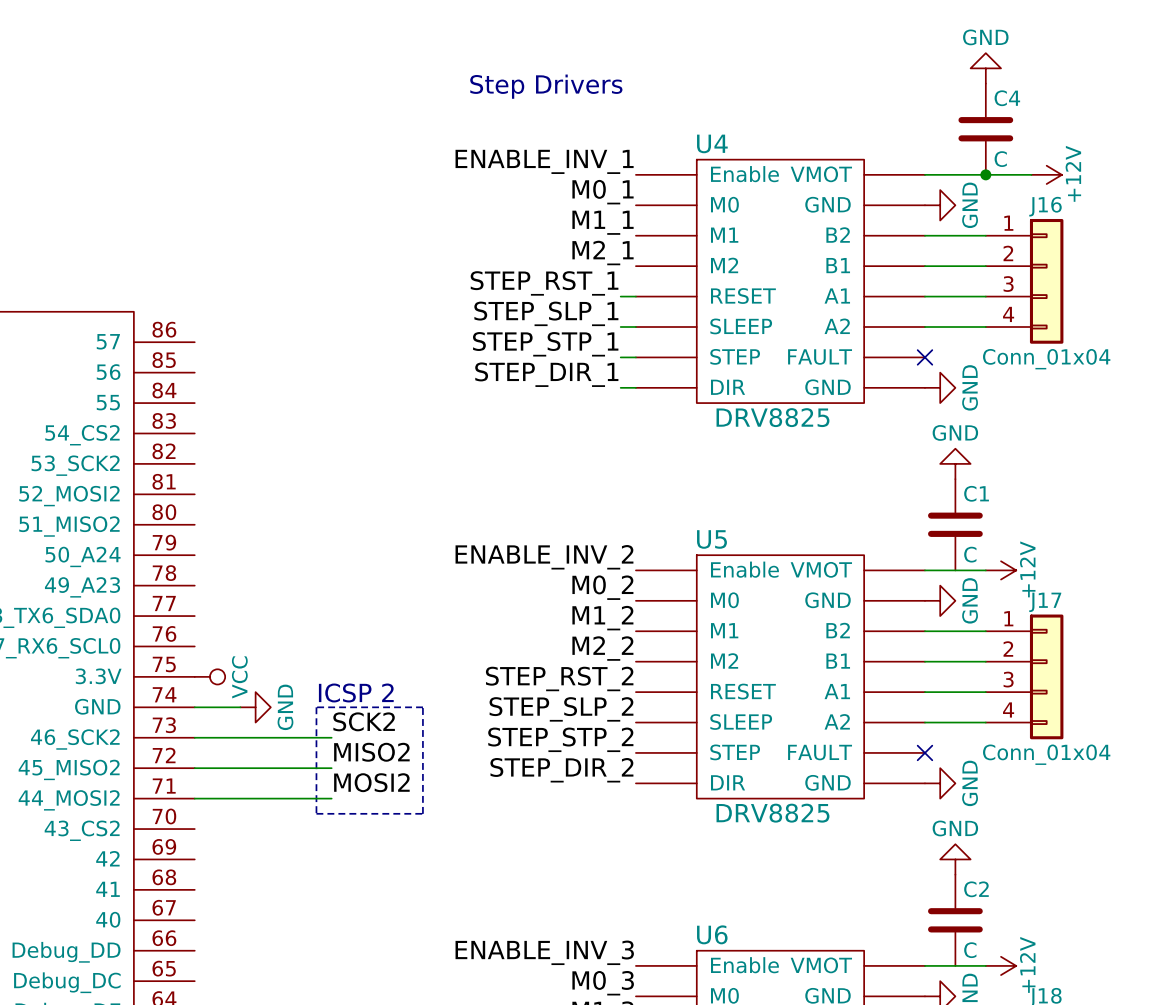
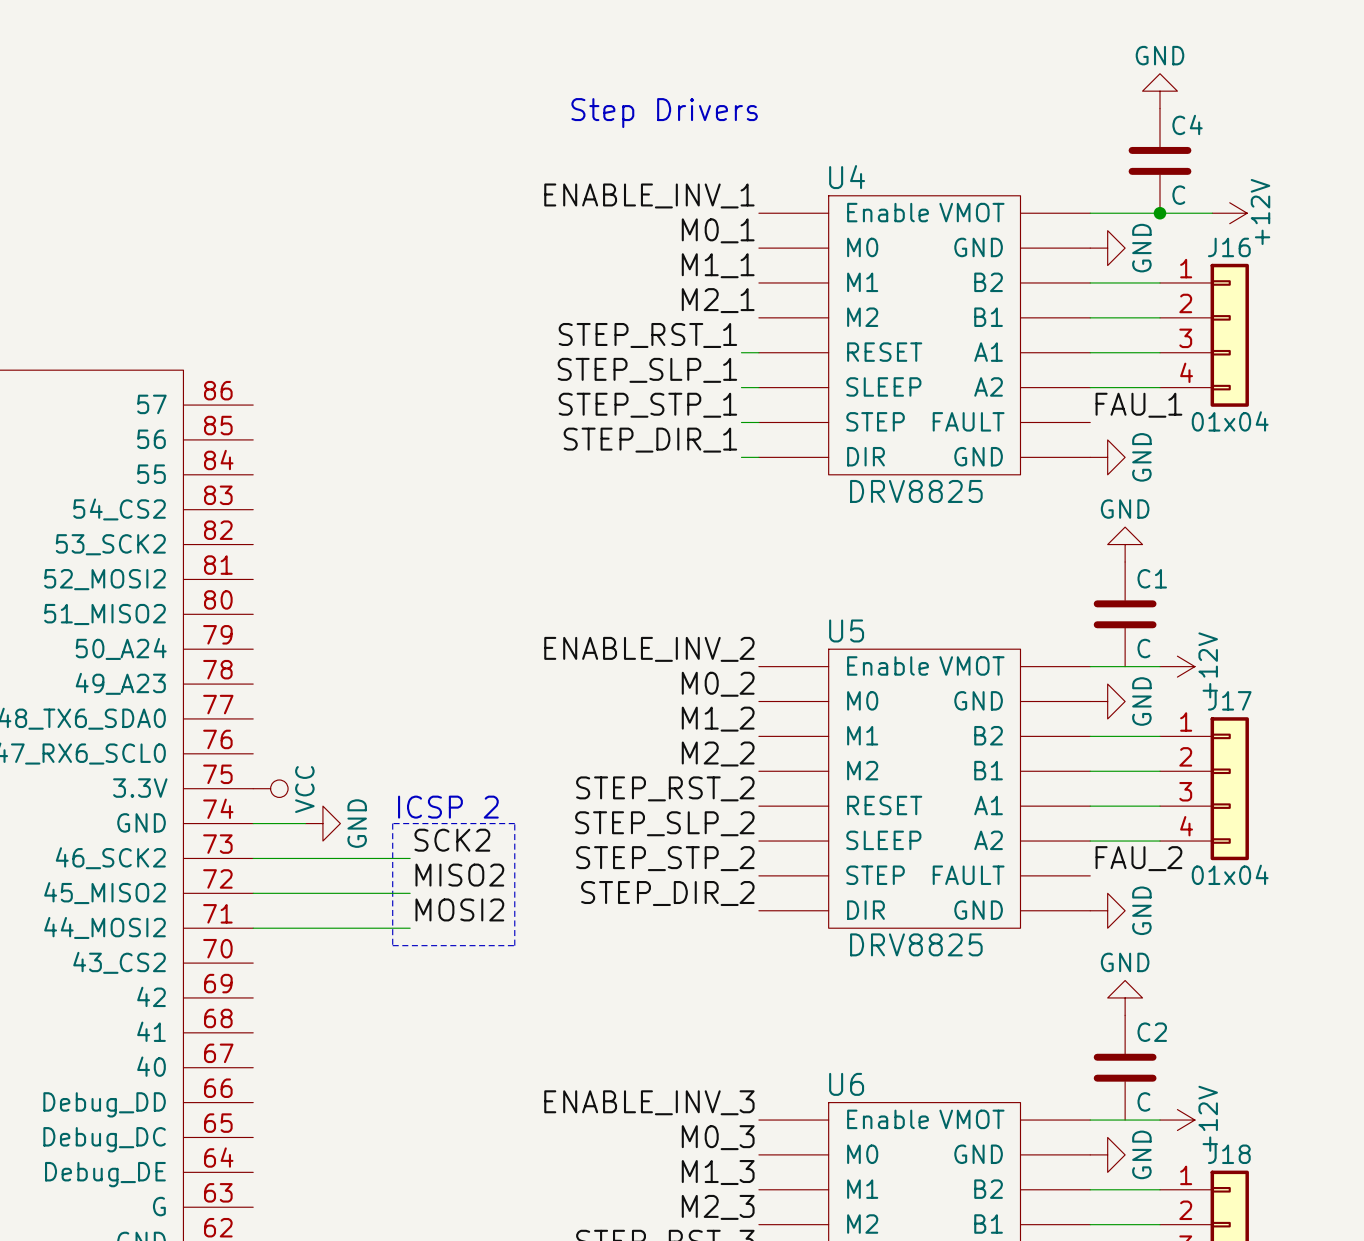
label: none -> FAU_1 (1138, 405)
no-connect mark: (924, 357) -> none
J16 value: Conn_01x04 (1046, 359) -> 01x04 (1230, 421)
label: none -> FAU_2 (1138, 858)
no-connect mark: (924, 752) -> none
J17 value: Conn_01x04 (1046, 754) -> 01x04 (1230, 874)

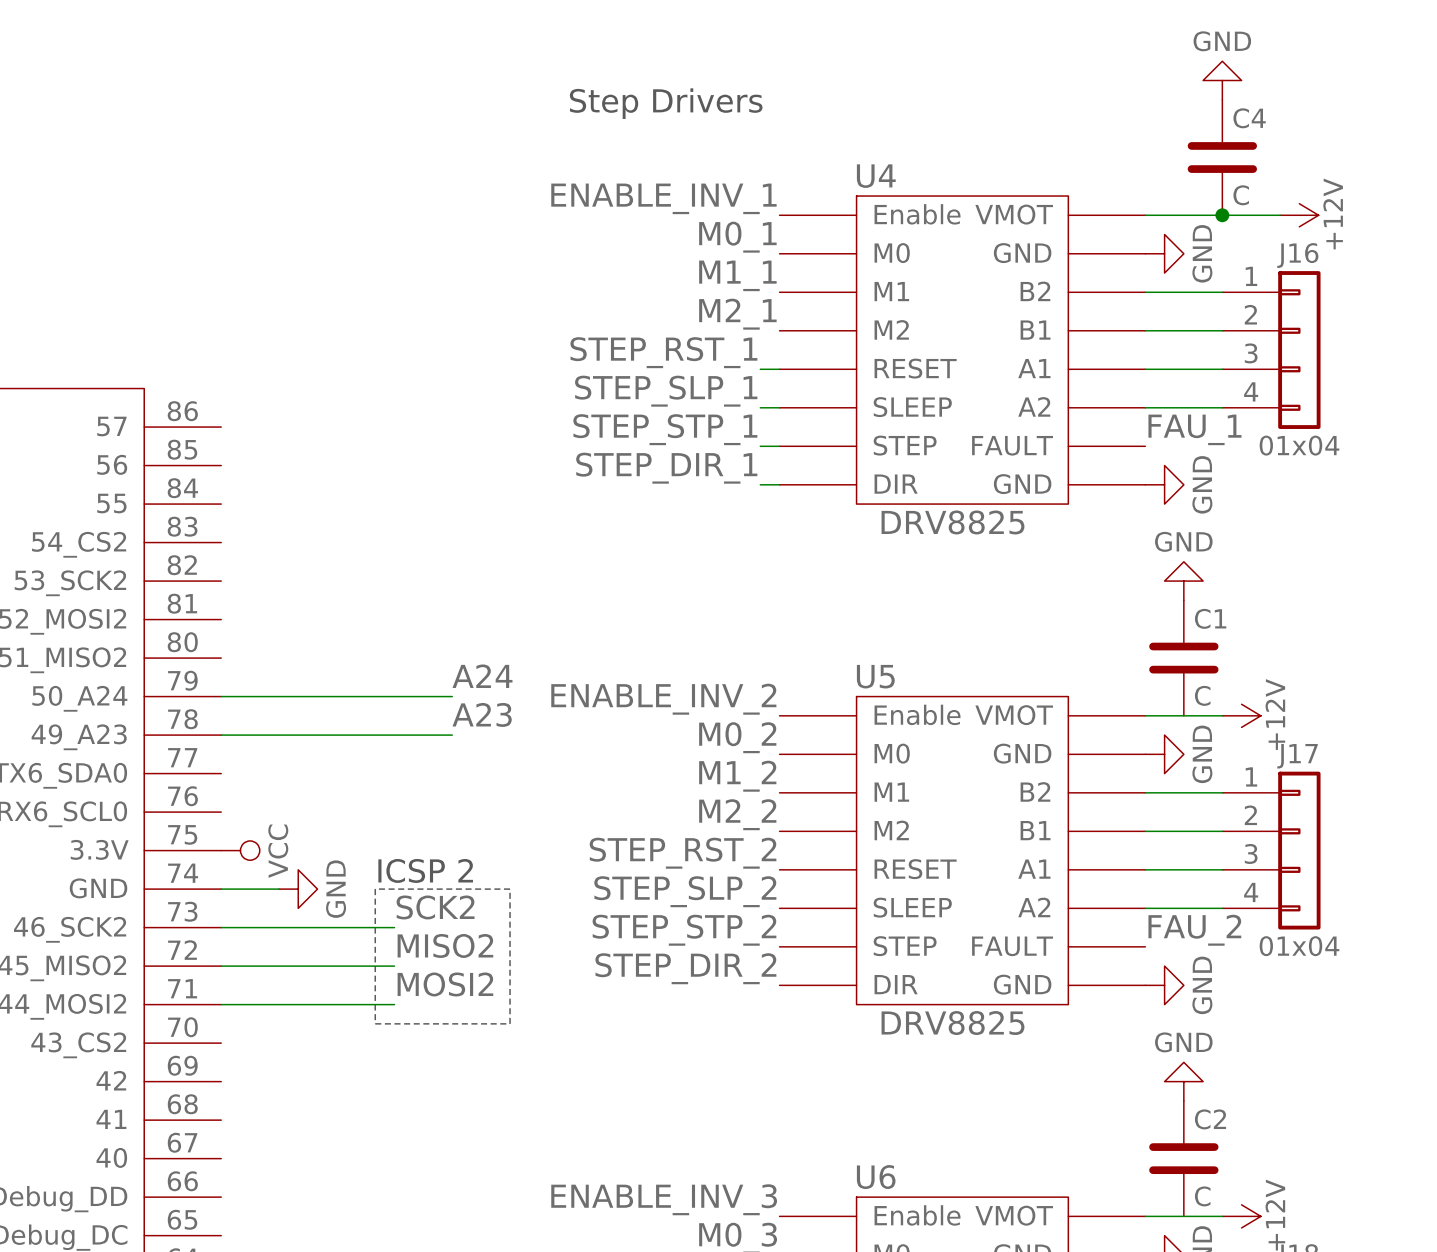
label: none -> A24 (482, 676)
wire: none -> (221, 696) (452, 696)
label: none -> A23 (482, 714)
wire: none -> (221, 735) (452, 735)

